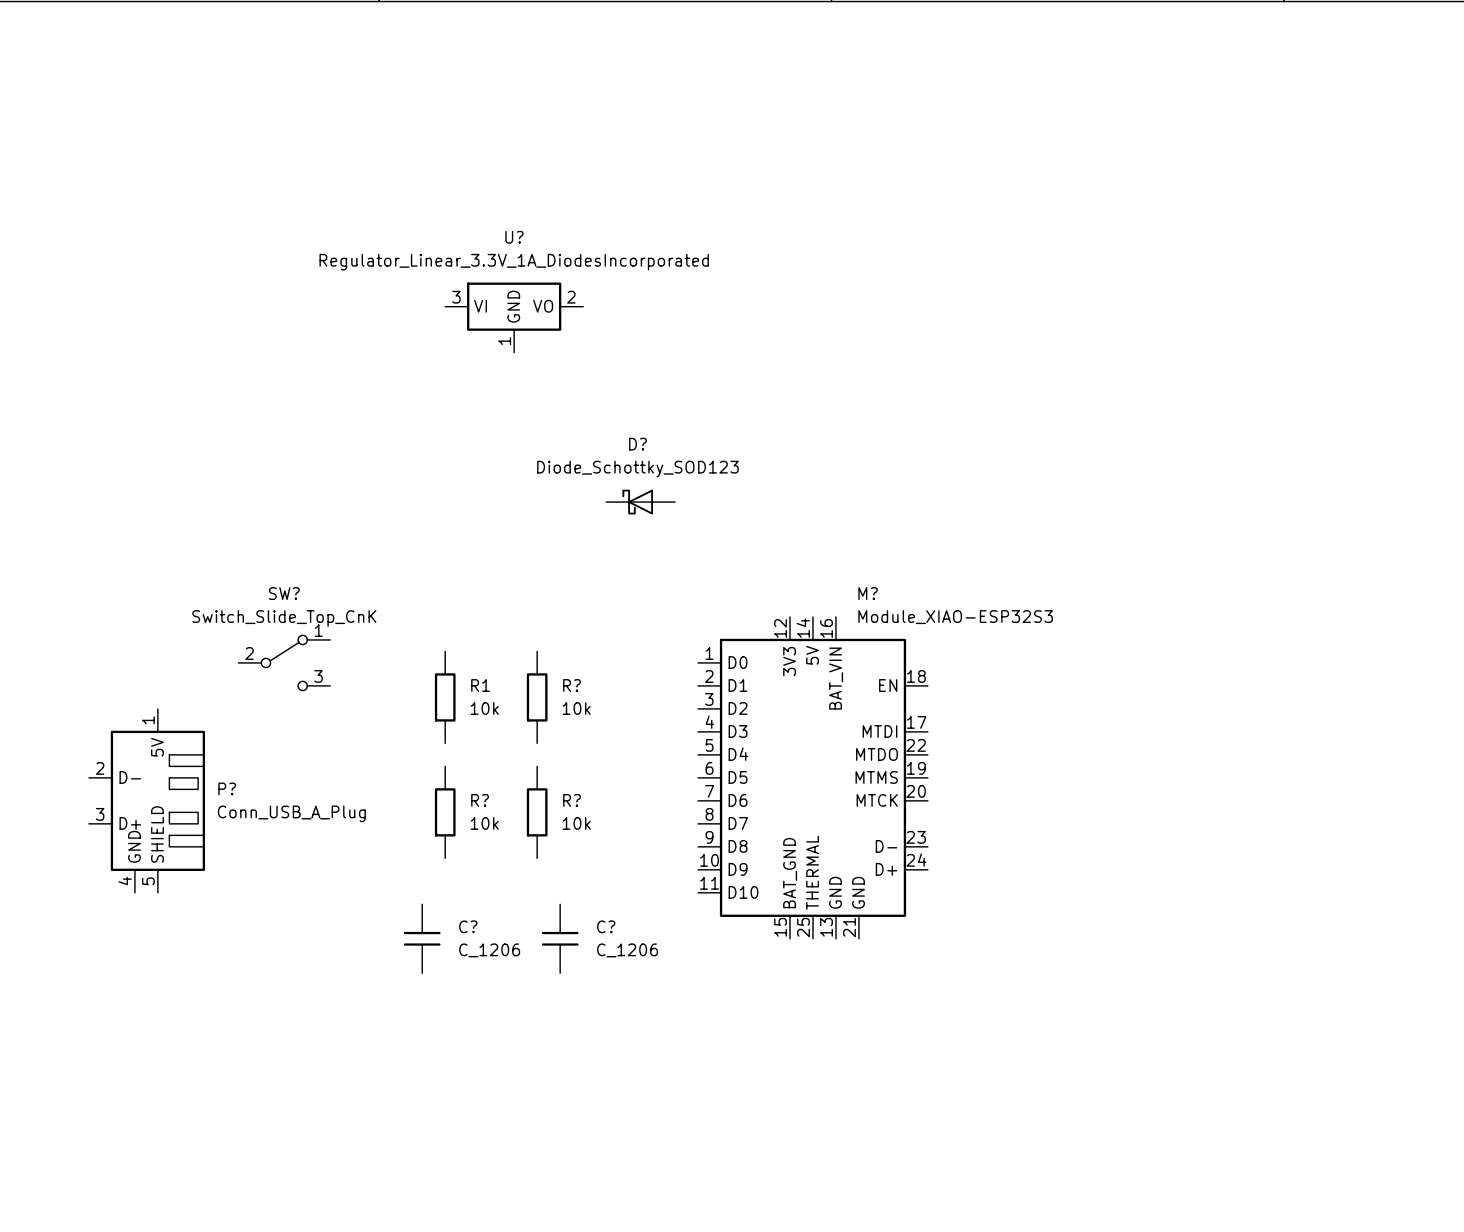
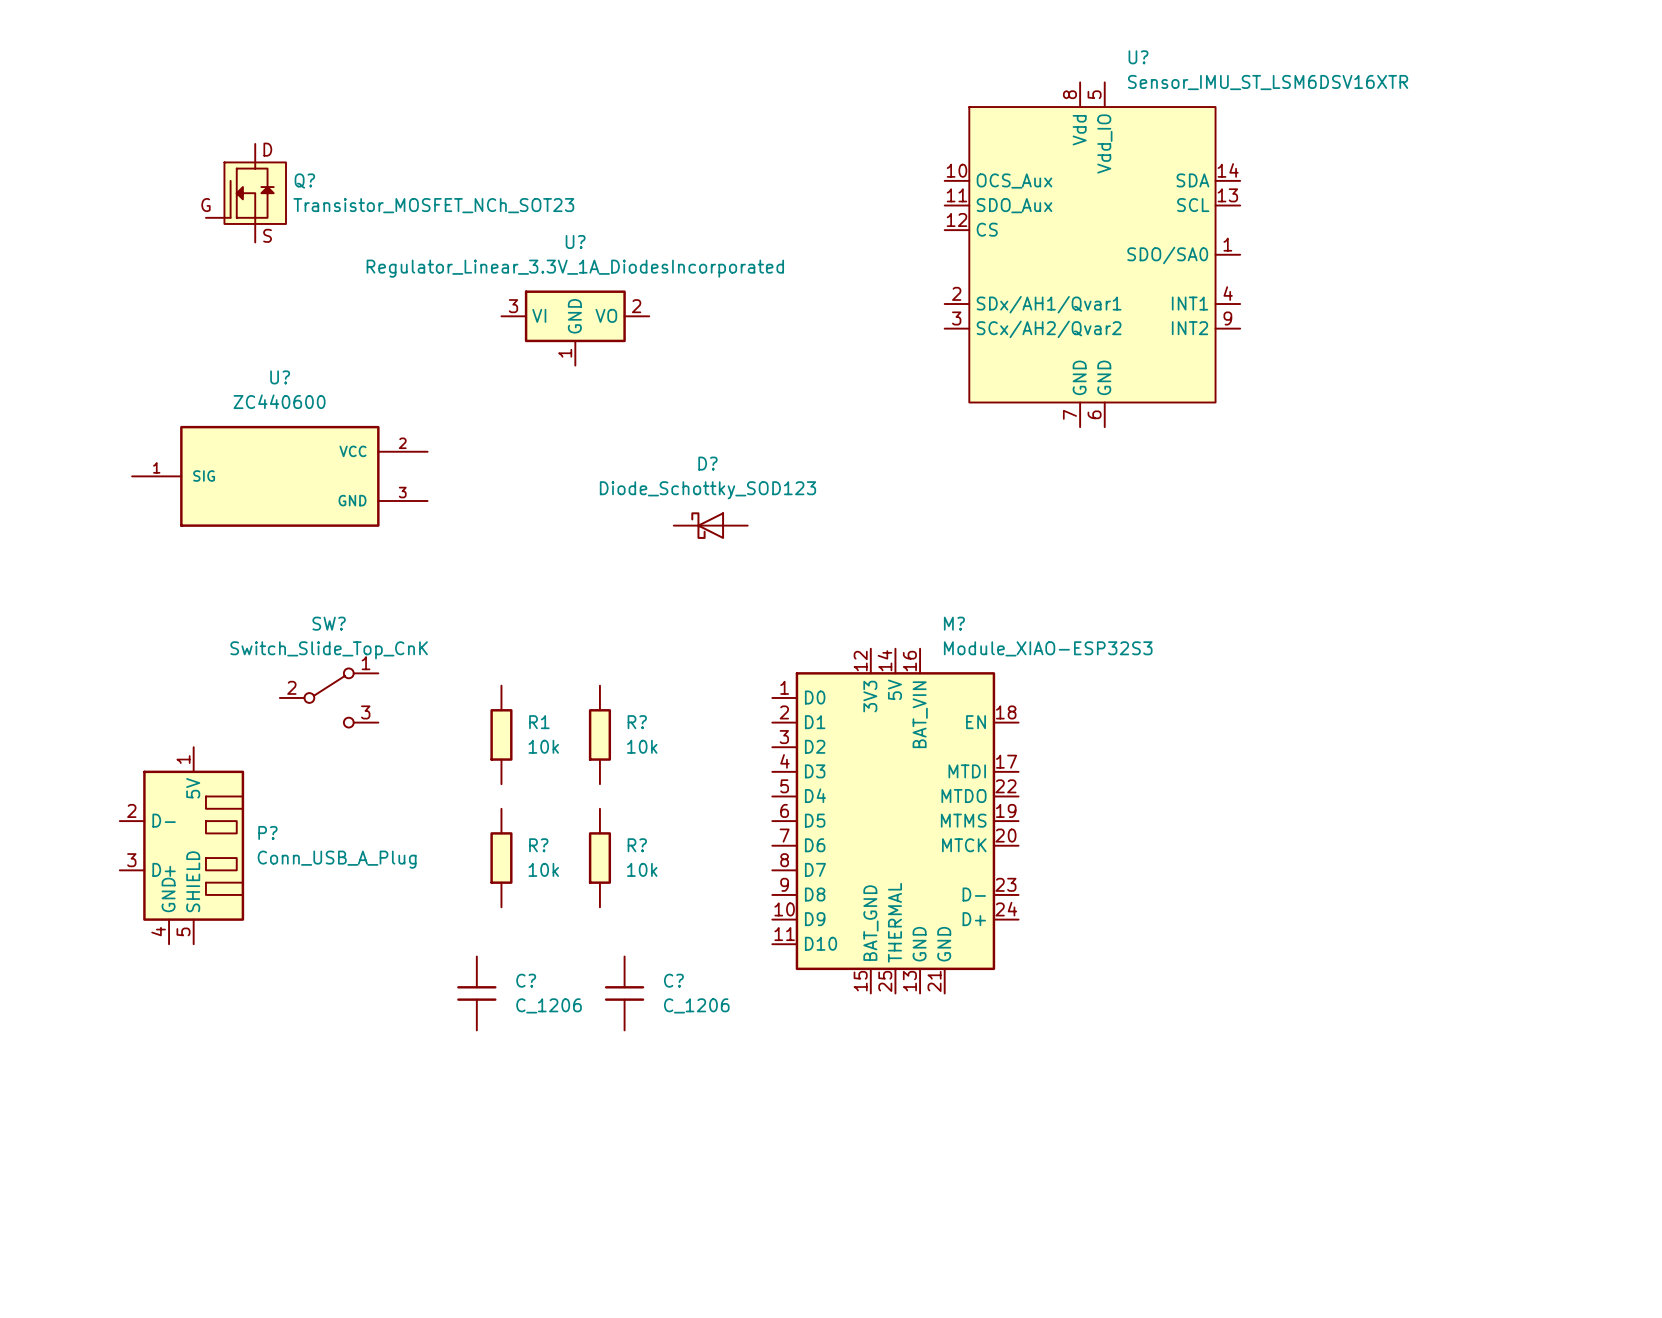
Q?: none -> Transistor_MOSFET_NCh_SOT23 (245, 193)
U?: none -> Sensor_IMU_ST_LSM6DSV16XTR (1092, 254)
U?: none -> ZC440600 (279, 476)

